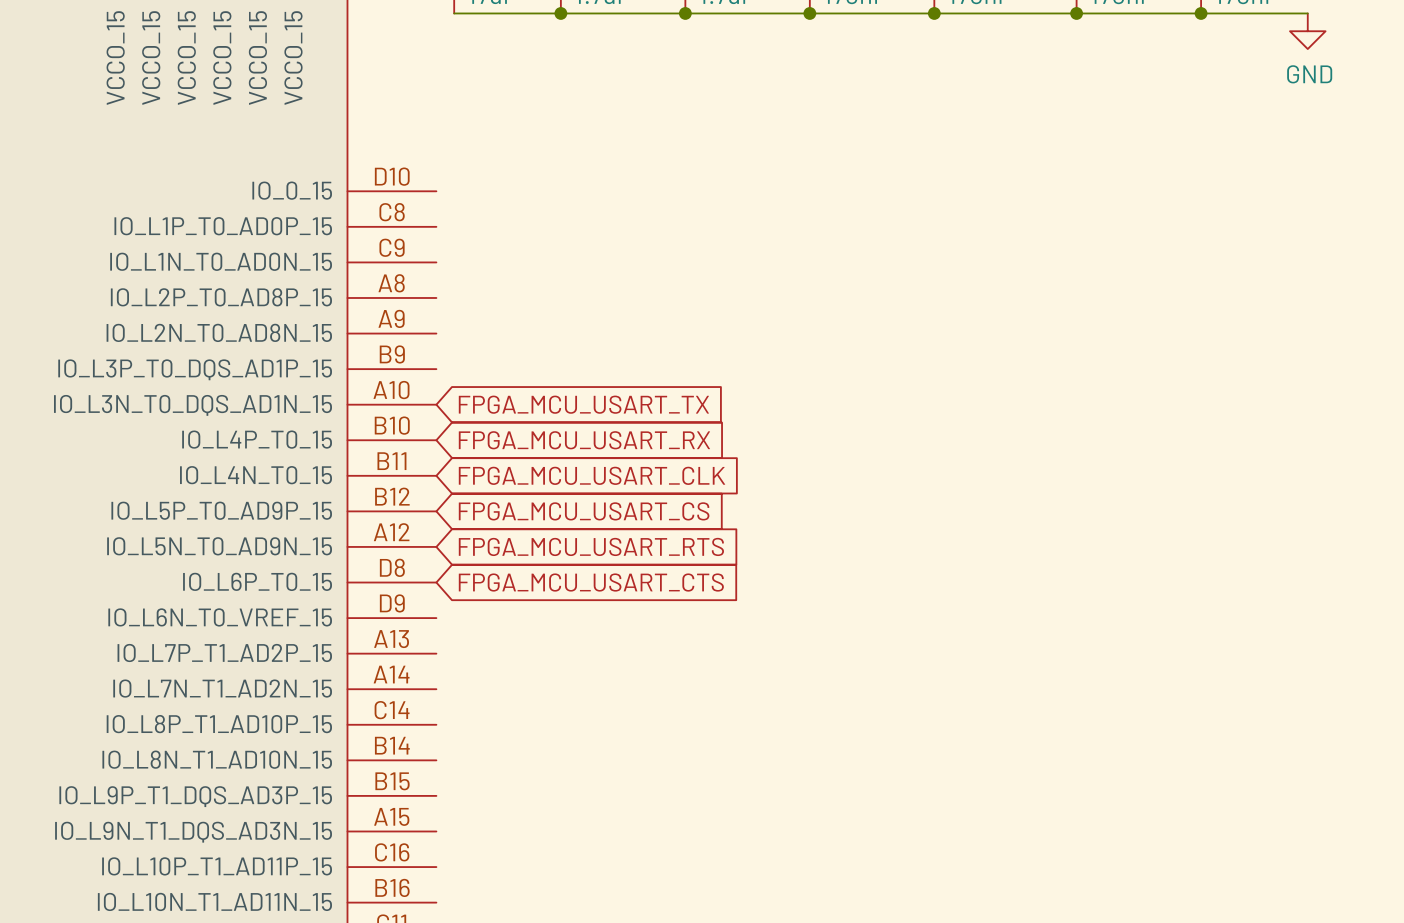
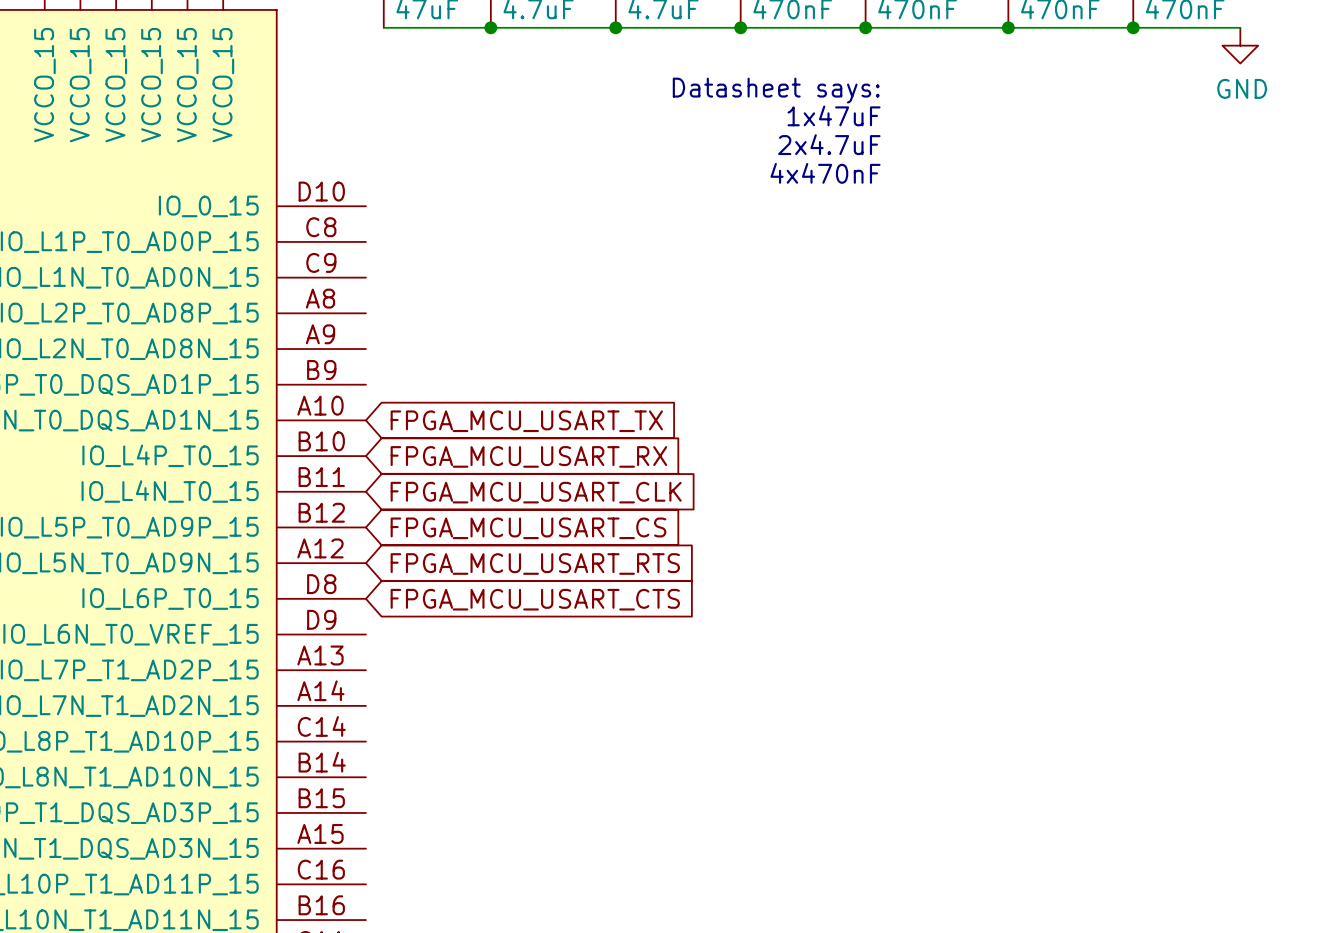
text: none -> Datasheet says: (776, 90)
text: none -> 1x47uF (834, 115)
text: none -> 2x4.7uF (829, 144)
text: none -> 4x470nF (825, 173)

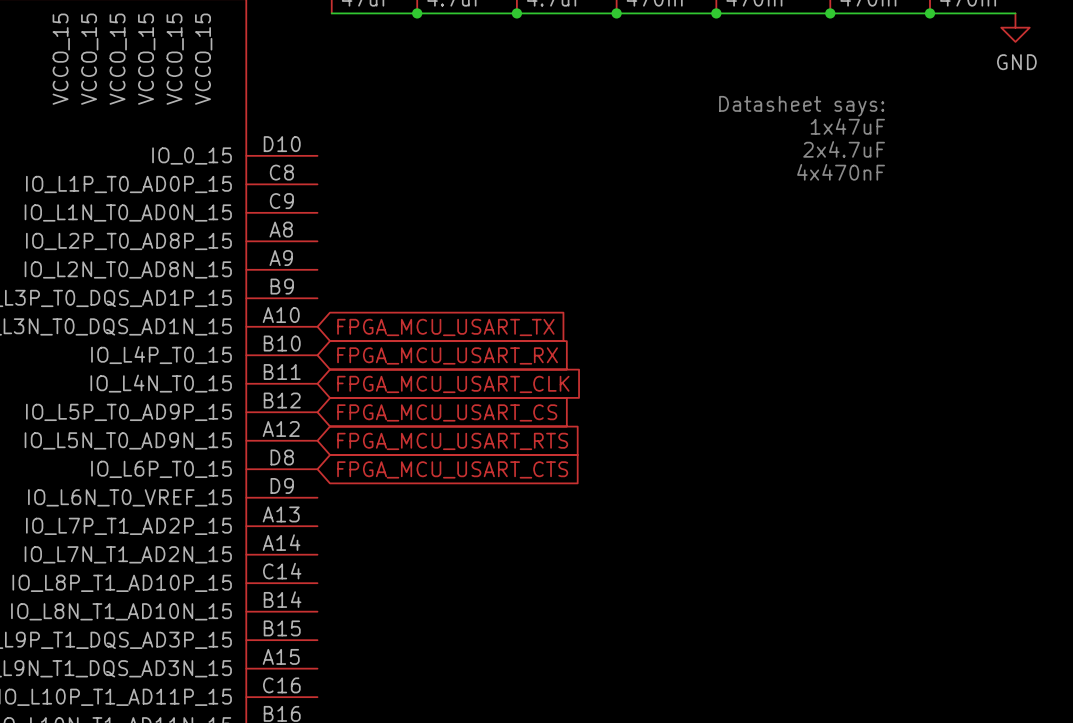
text position: Datasheet says: (776, 90) -> Datasheet says: (801, 106)
text position: 1x47uF (834, 115) -> 1x47uF (847, 126)
text position: 2x4.7uF (829, 144) -> 2x4.7uF (844, 149)
text position: 4x470nF (825, 173) -> 4x470nF (841, 172)

